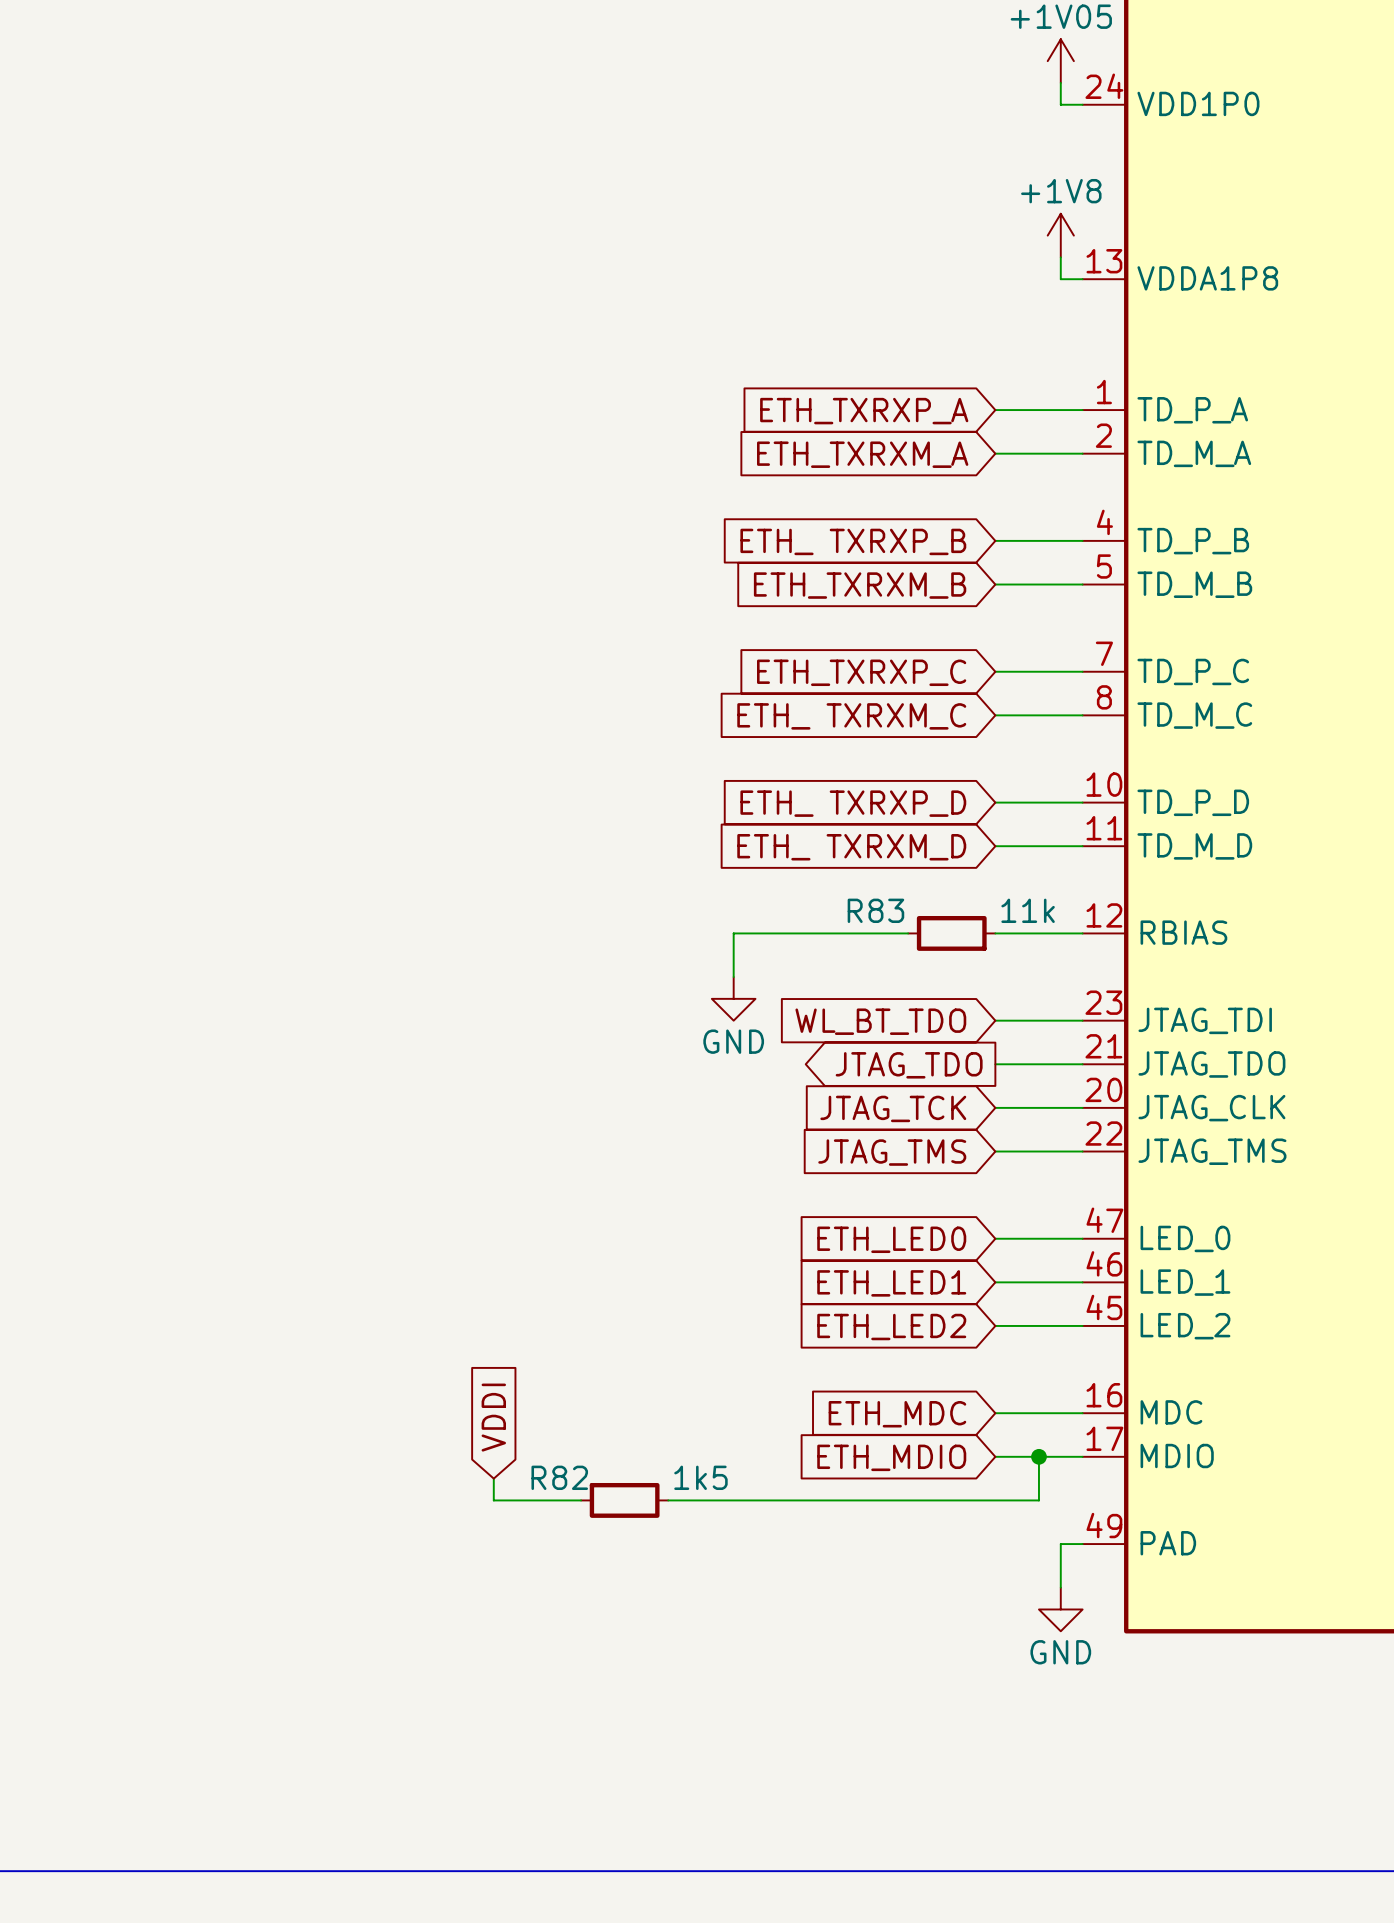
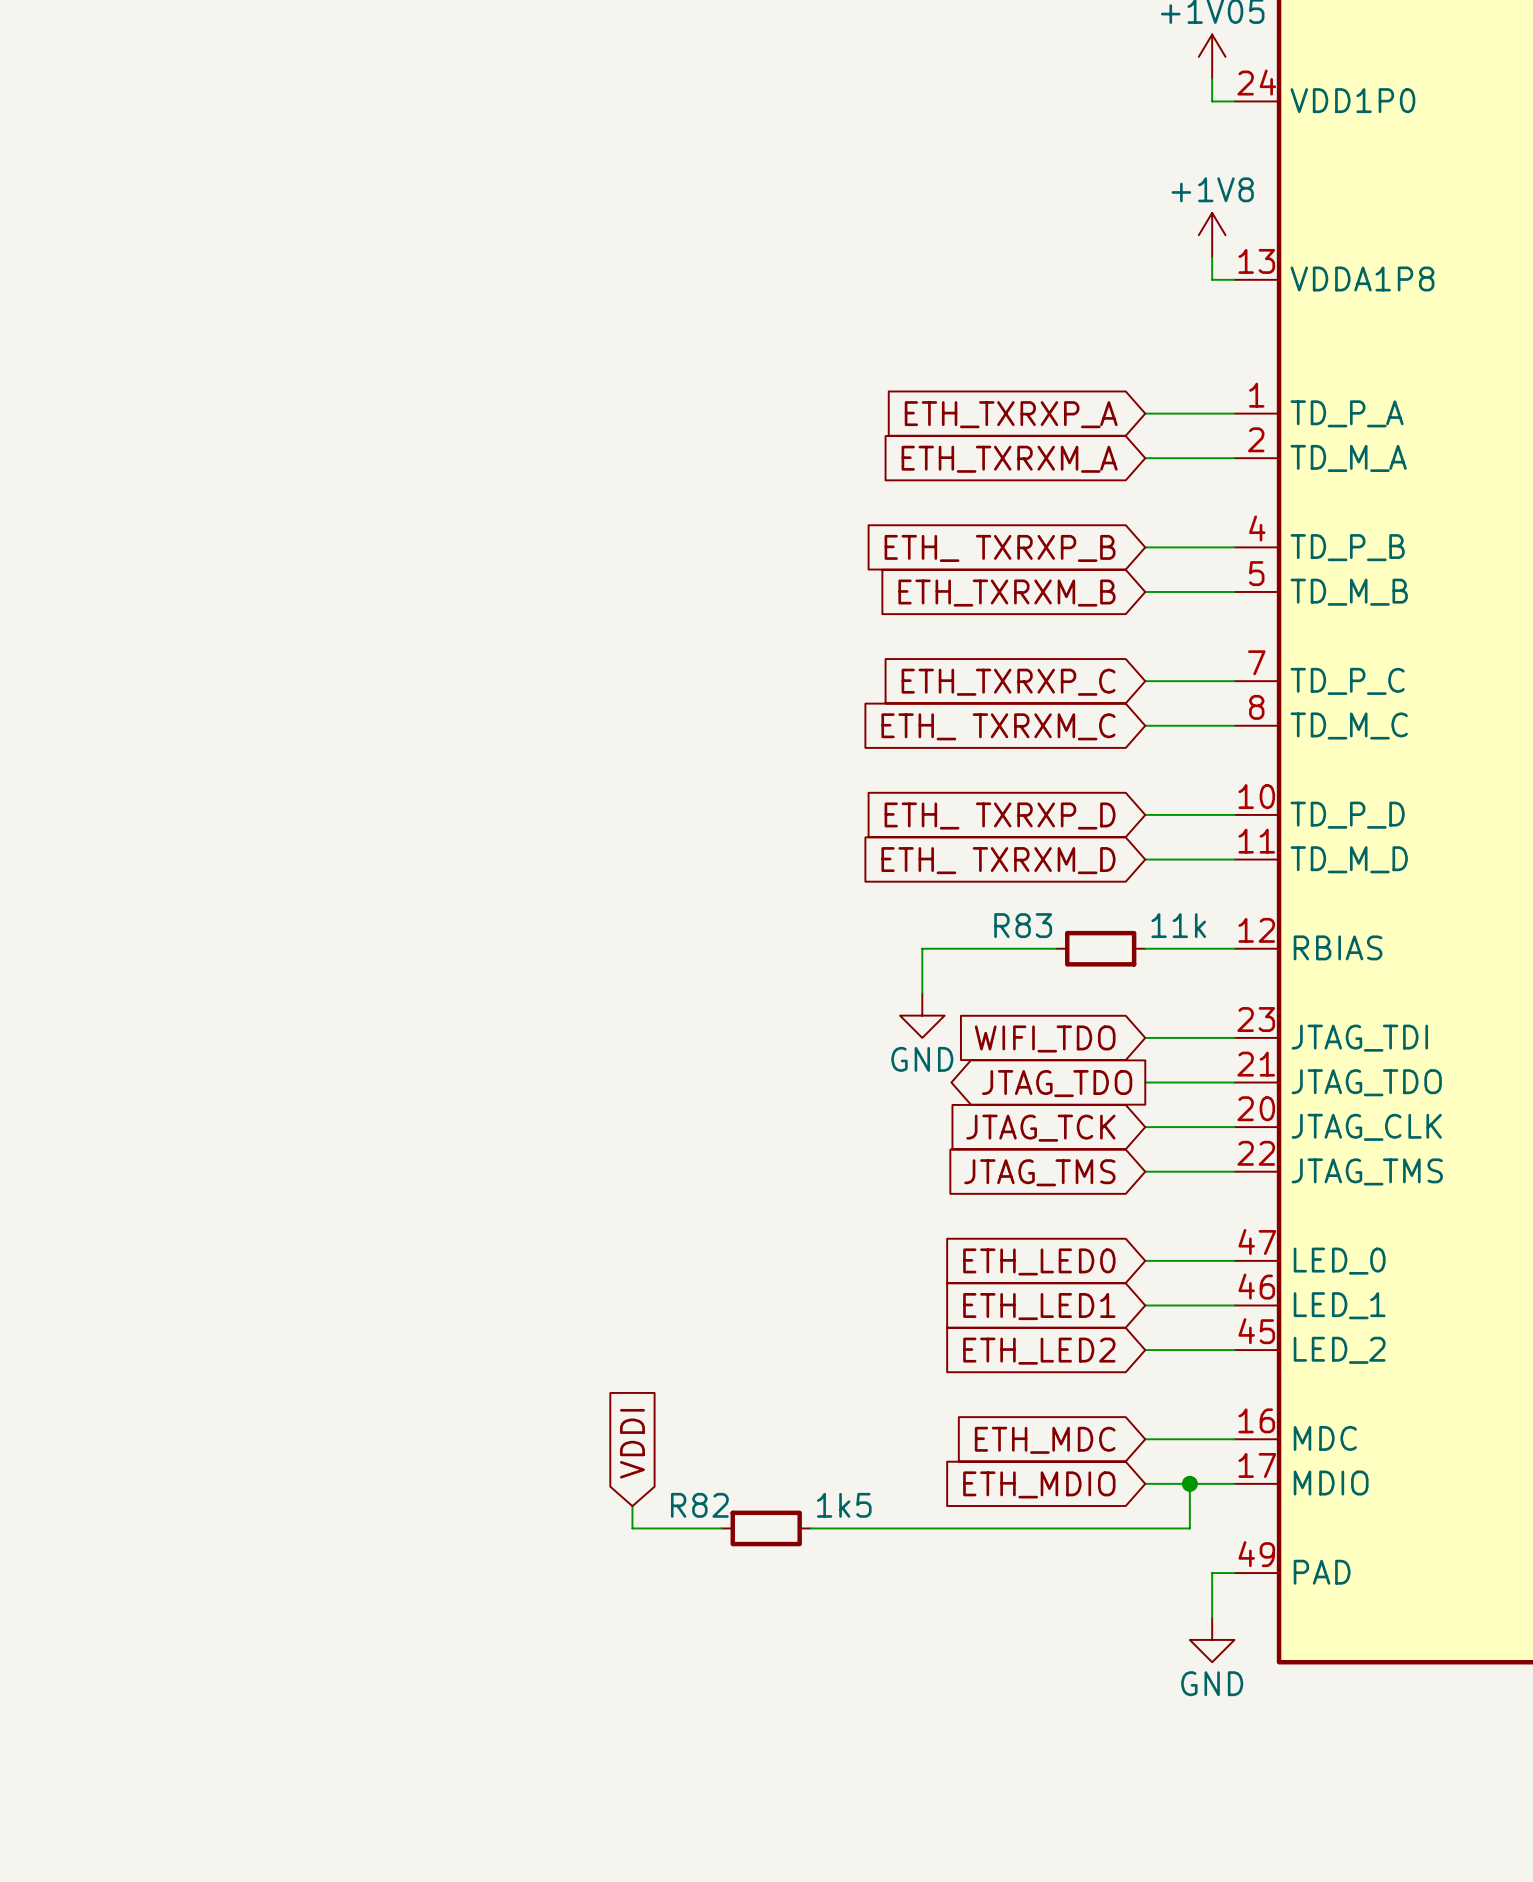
wire: (777, 933) (733, 933) (733, 977) -> (922, 948) (922, 993)
power symbol position: GND (733, 998) -> GND (922, 1015)
global label: WL_BT_TDO (880, 1021) -> WIFI_TDO (1045, 1038)

